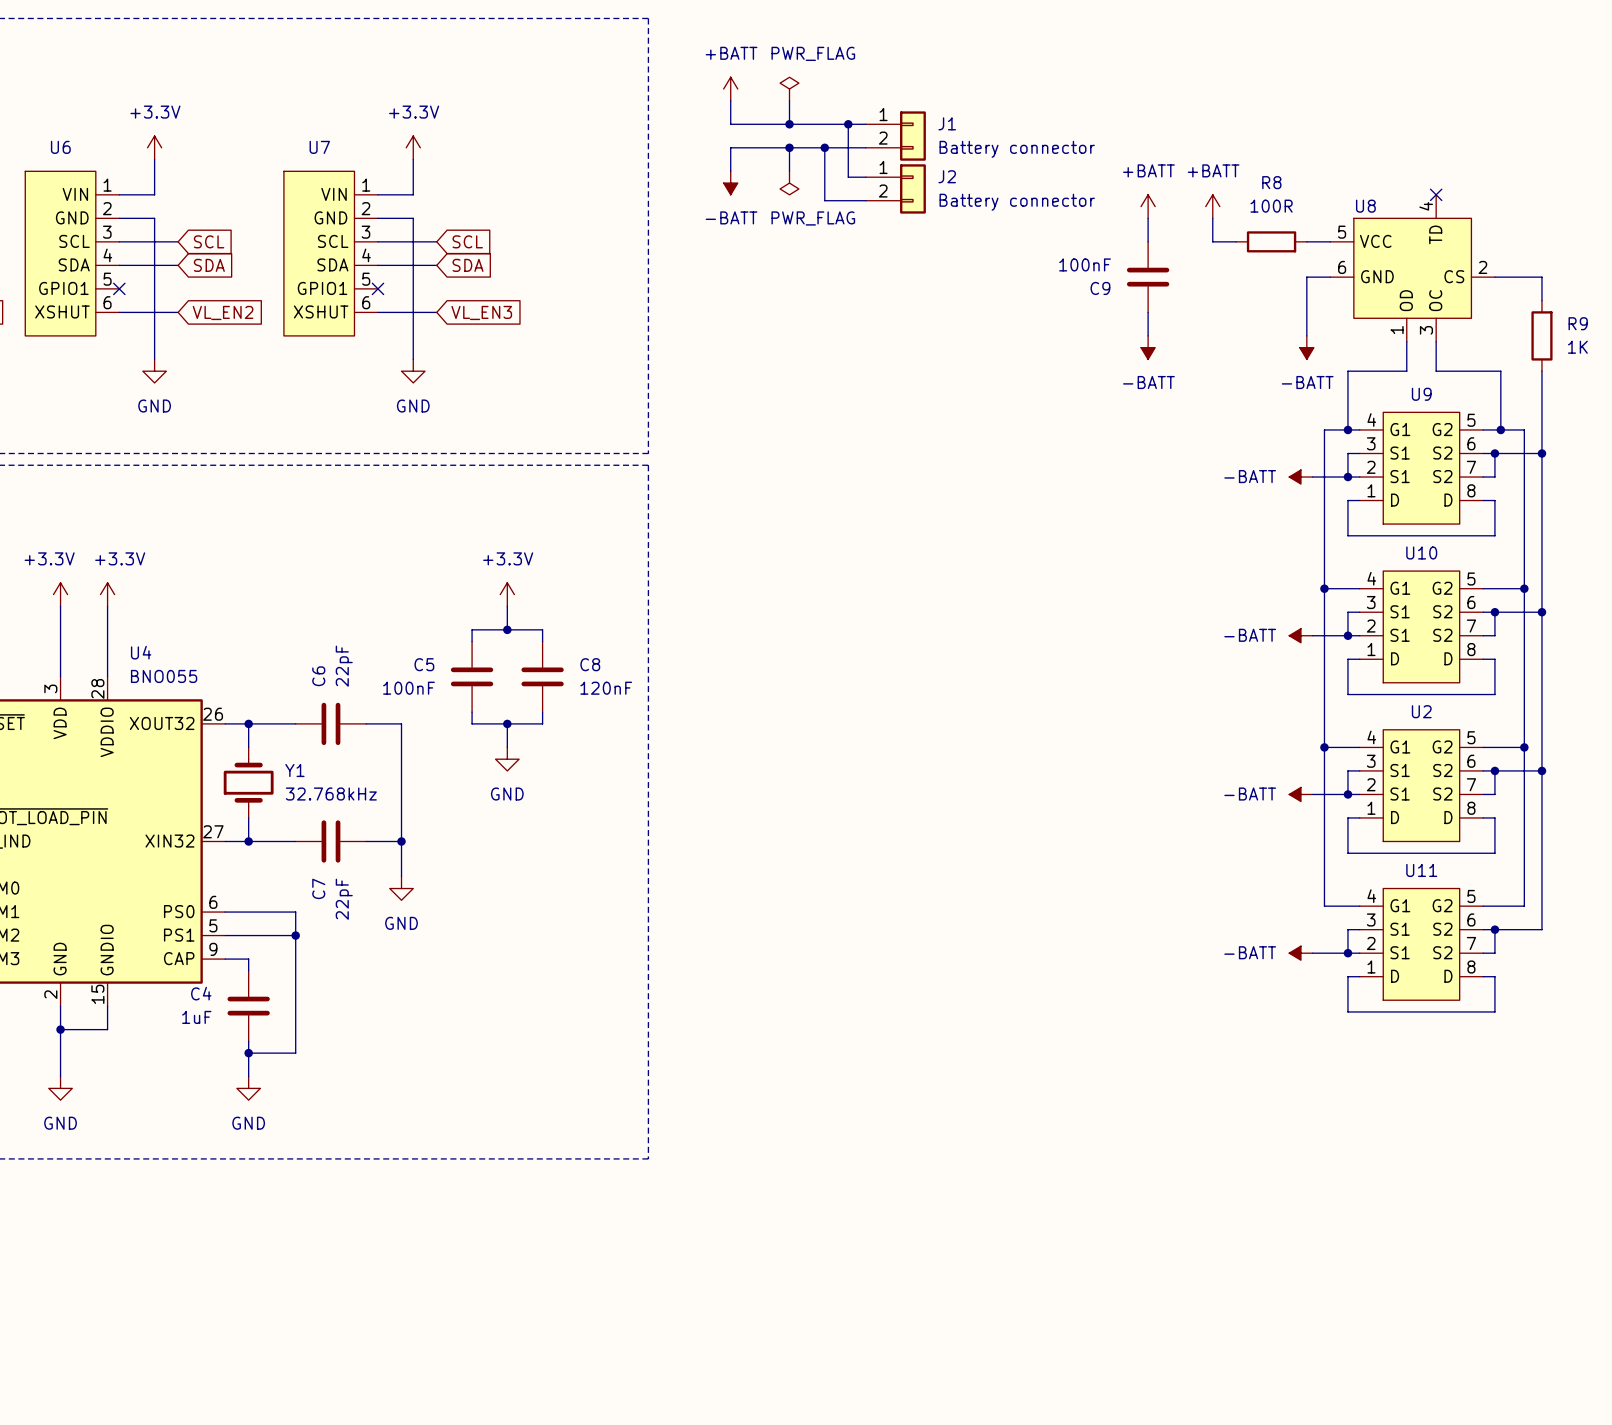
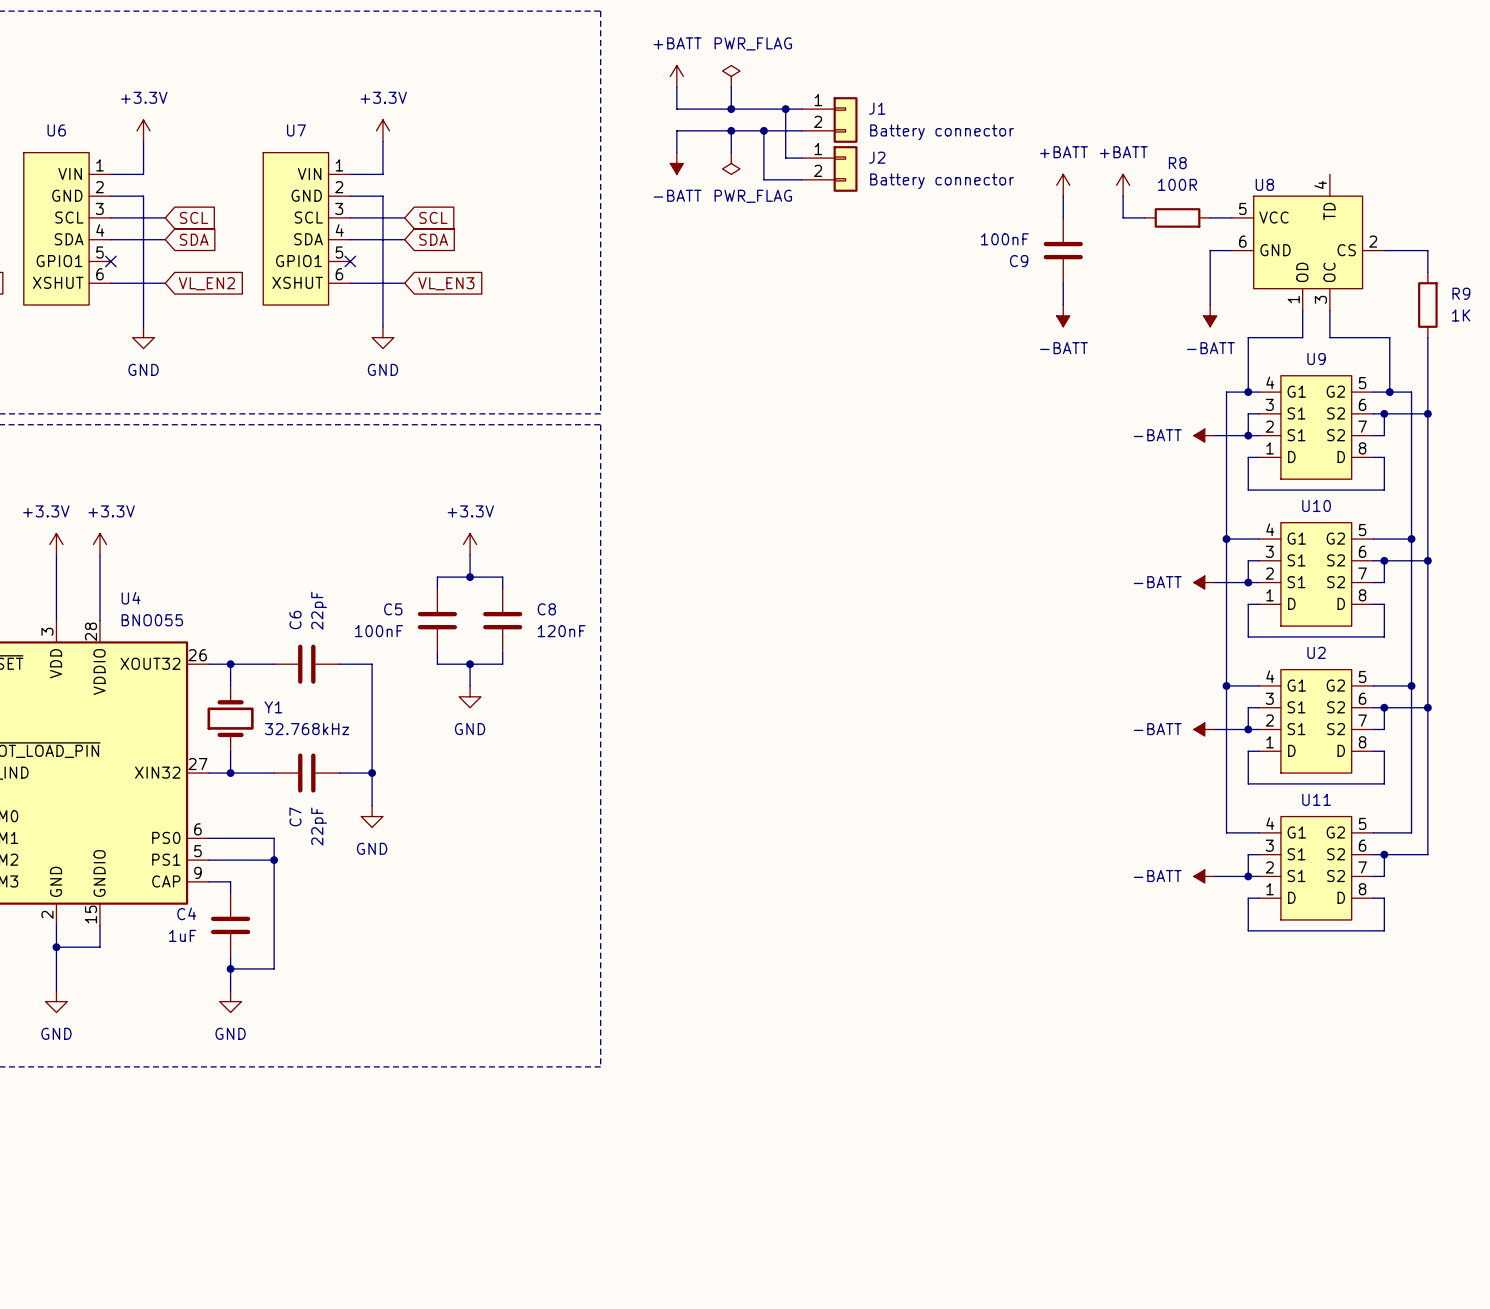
no-connect mark: (1436, 194) -> none

